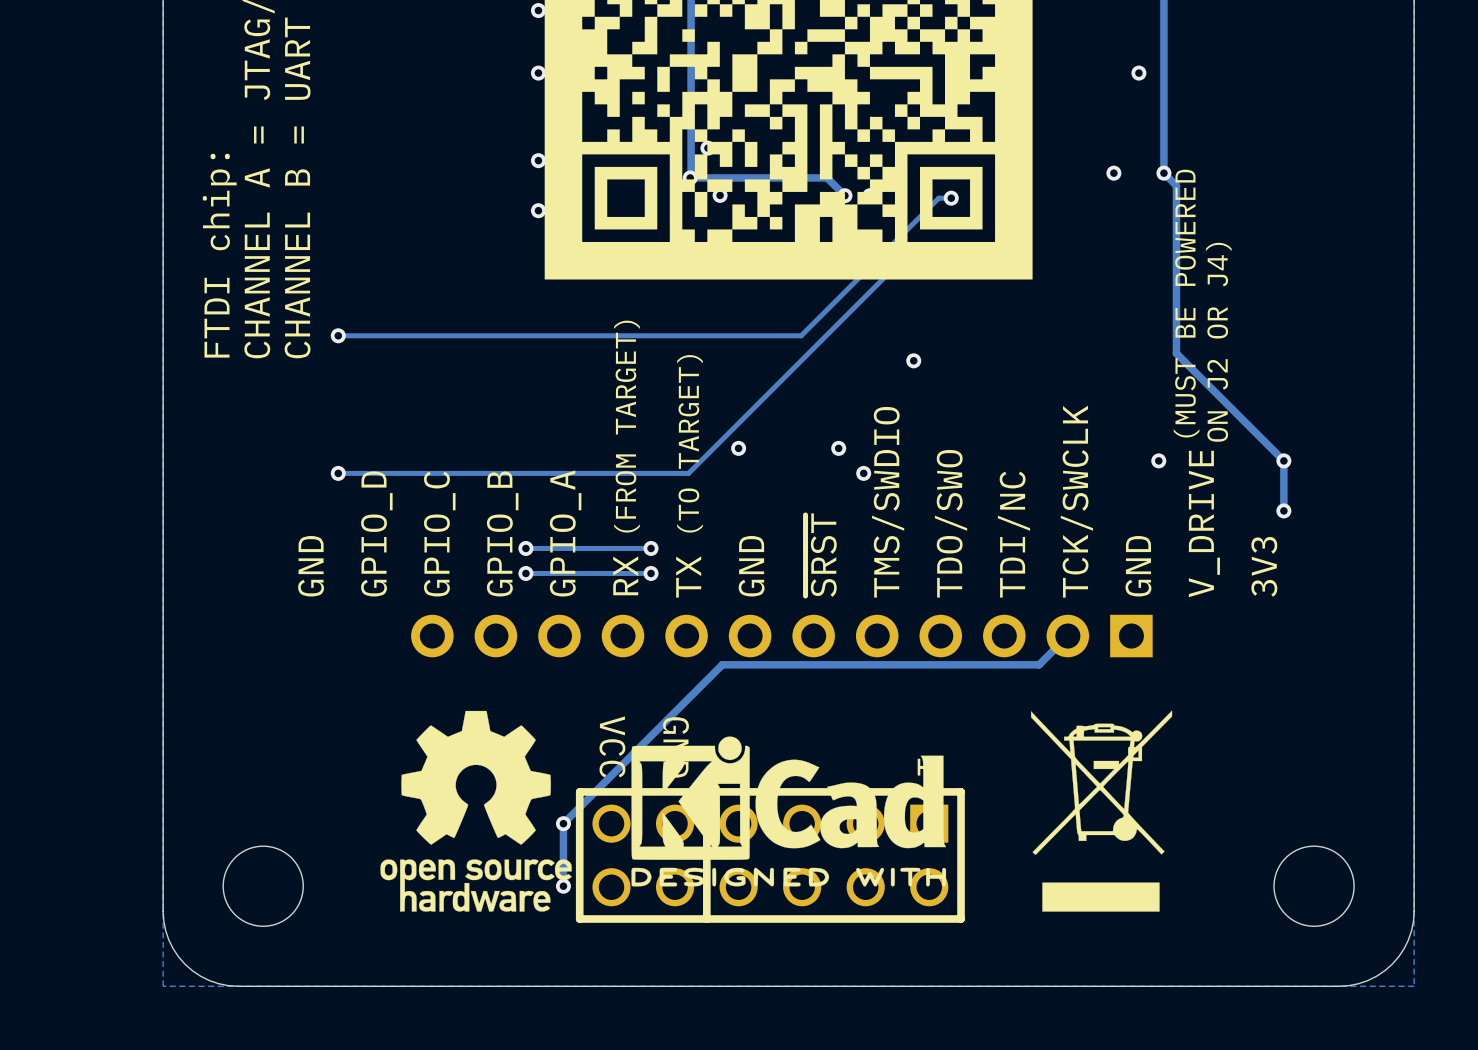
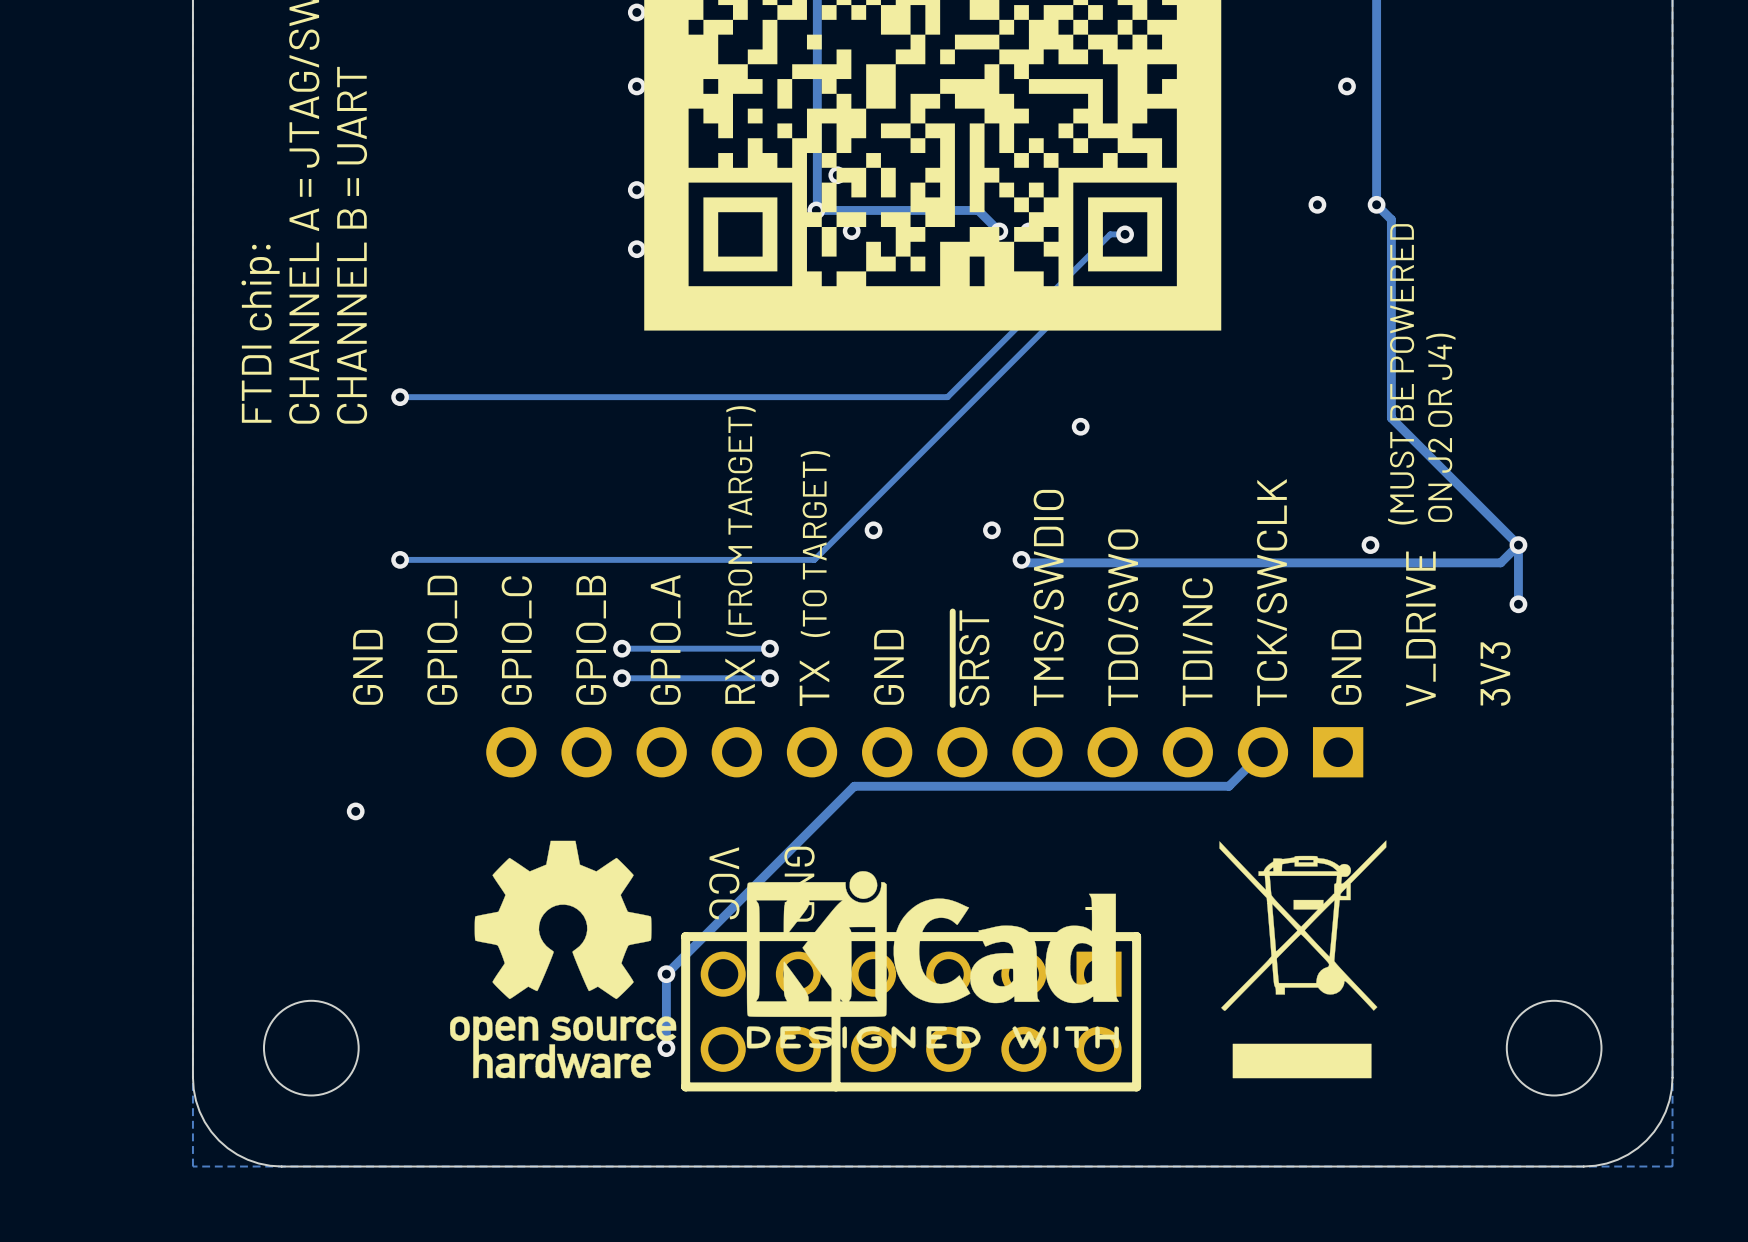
track: none -> (1518, 545) (1500, 562) (1024, 562) (1021, 559)
via: none -> (355, 811)

